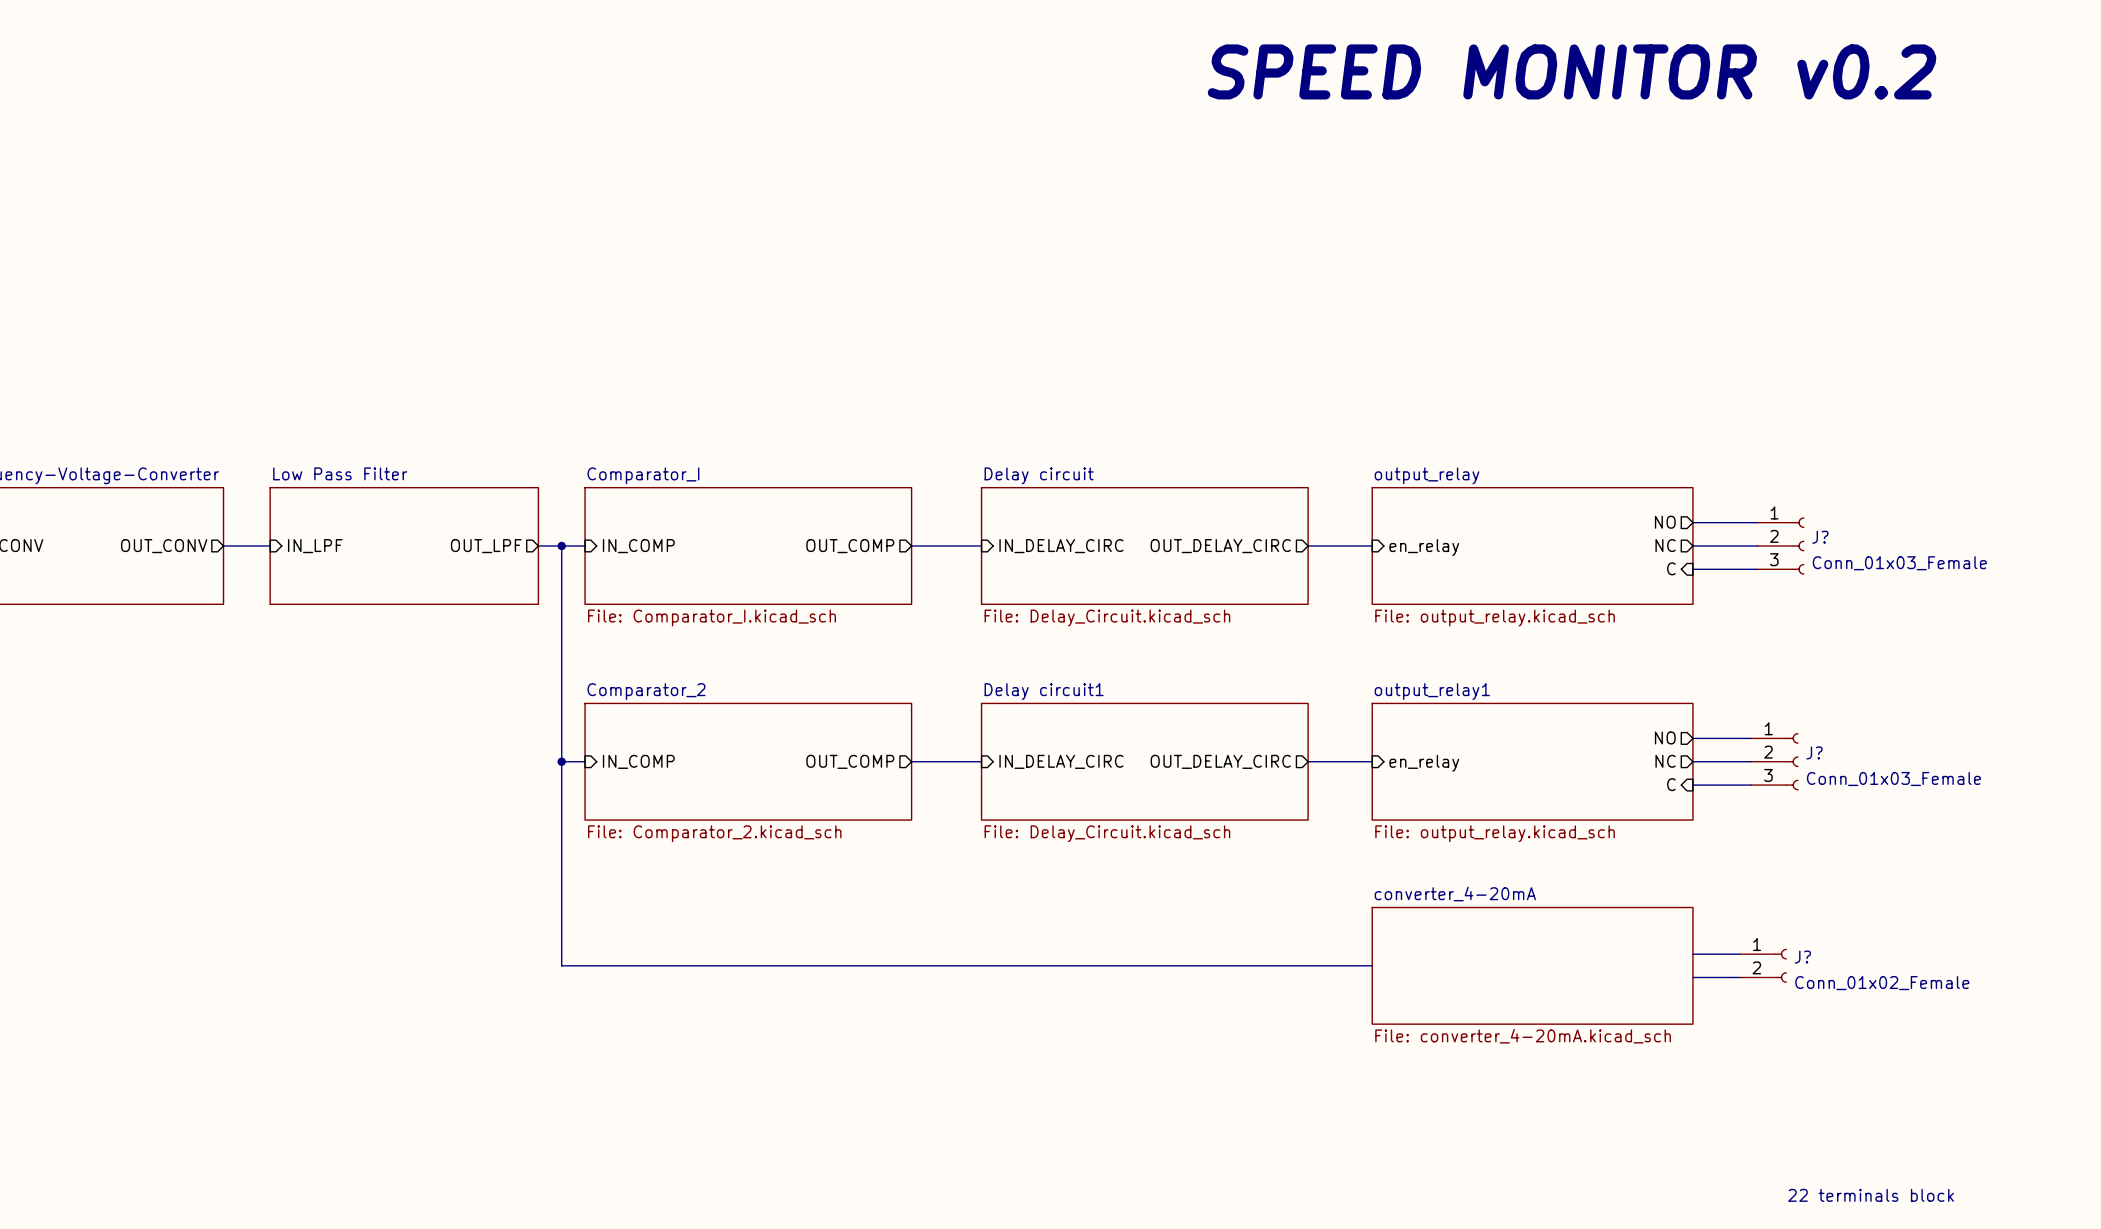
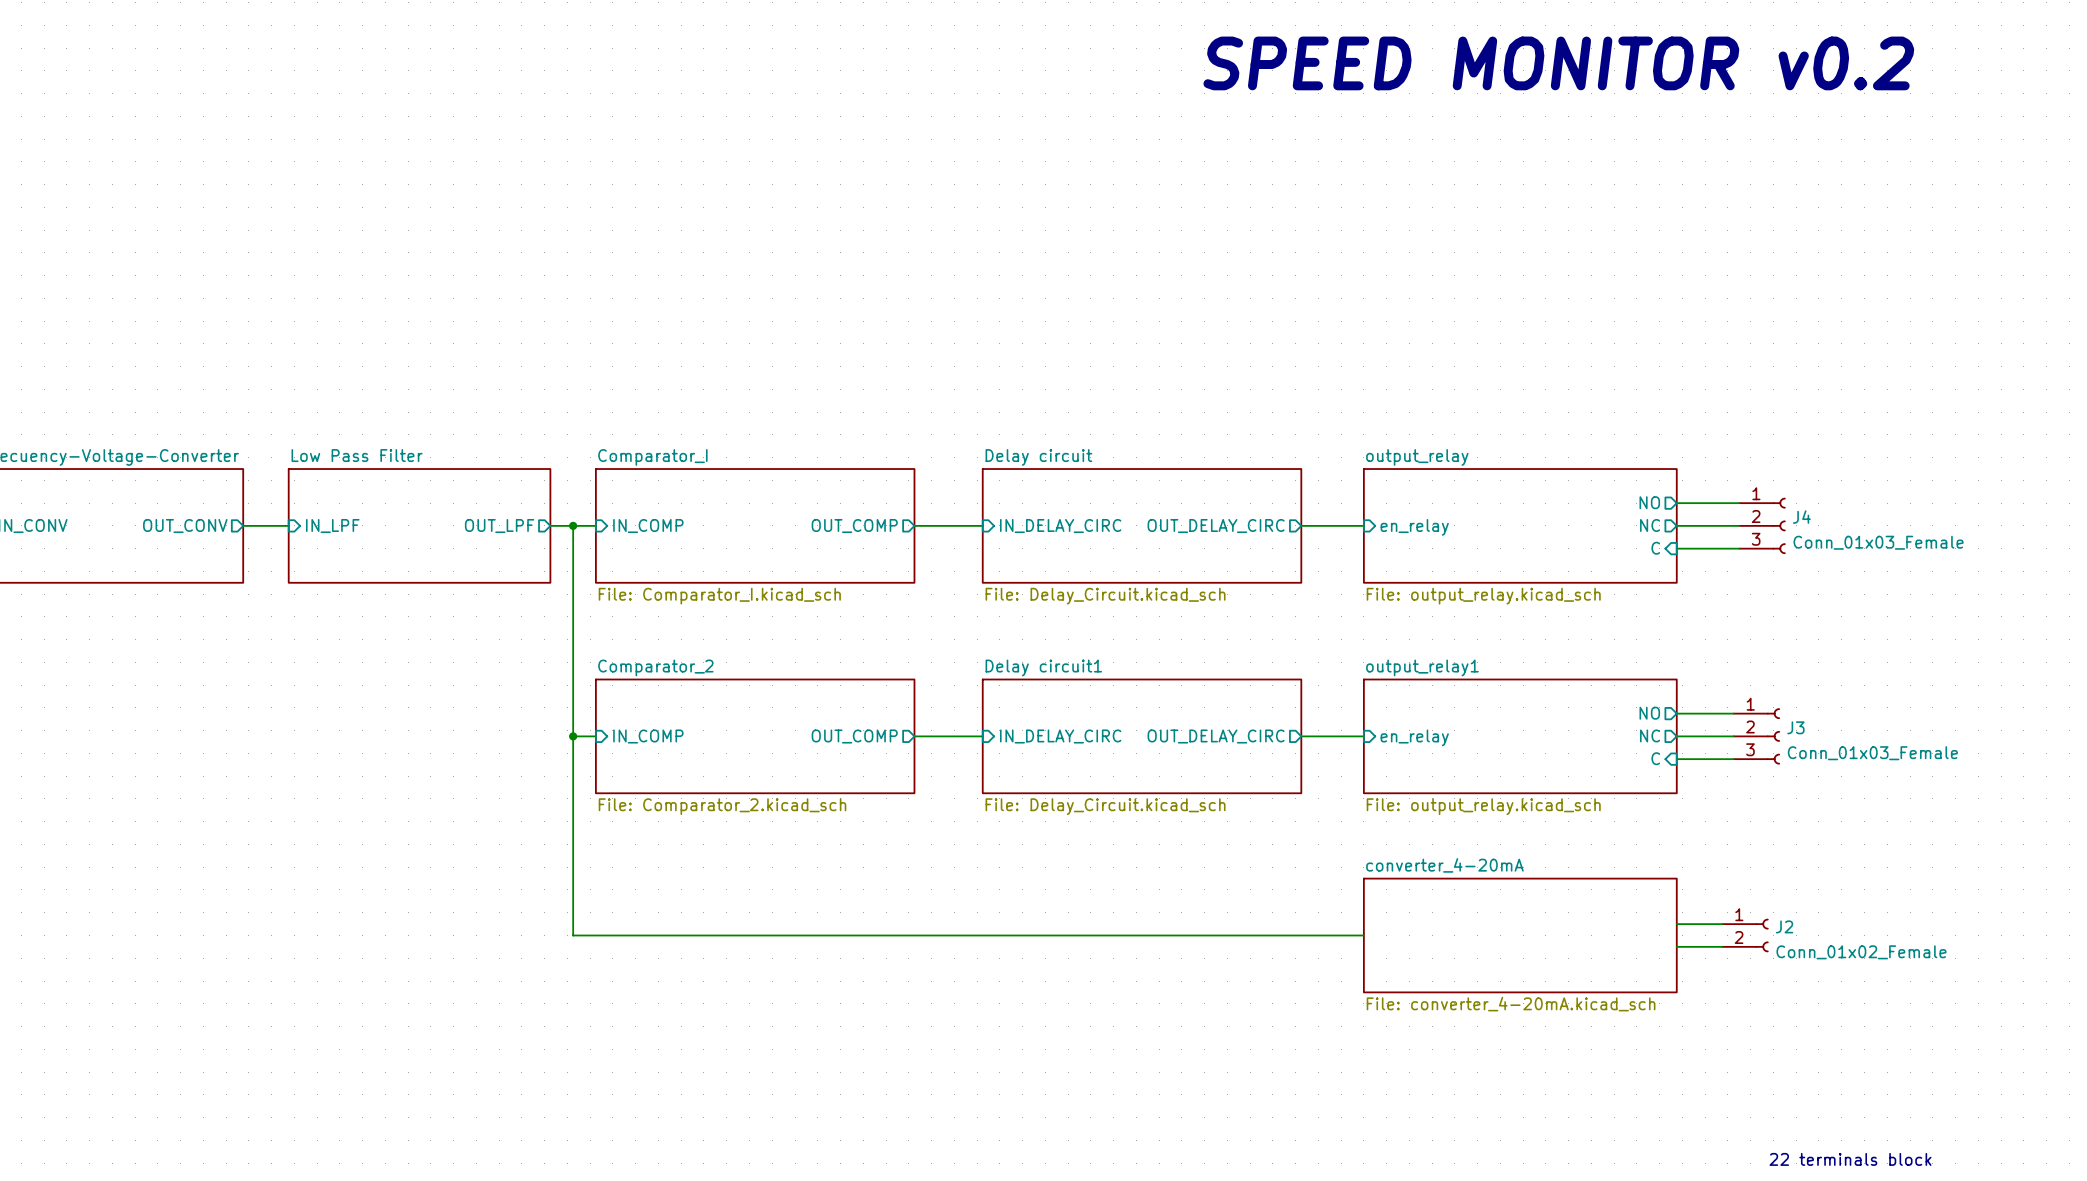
J? name: J? (1820, 537) -> J4 (1801, 517)
J? name: J? (1814, 752) -> J3 (1795, 727)
J? name: J? (1802, 957) -> J2 (1784, 926)

